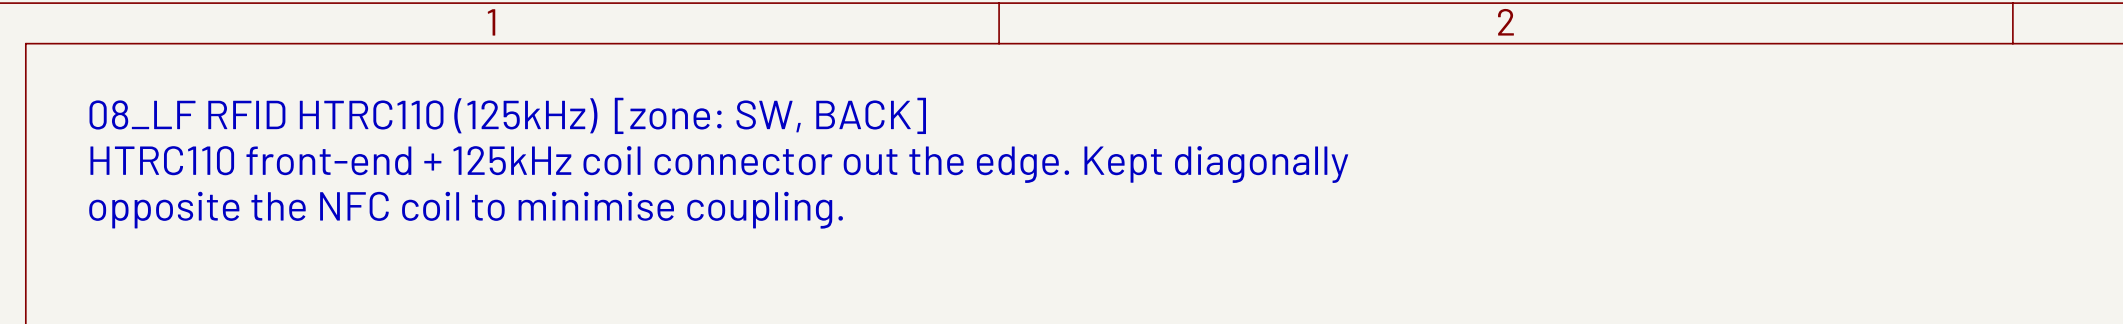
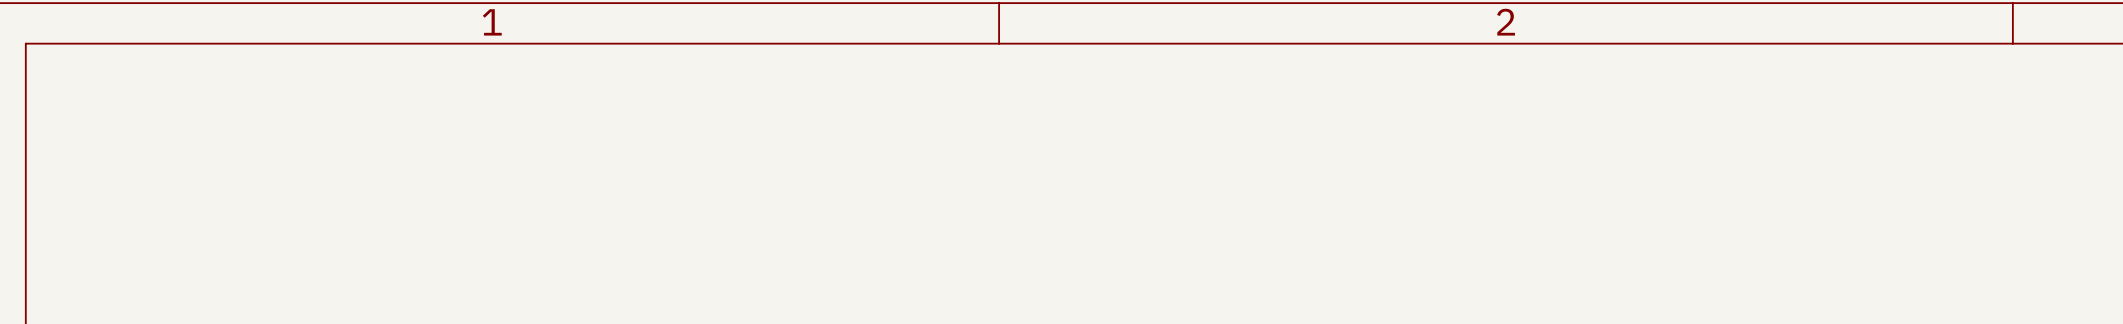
text: 08_LF RFID HTRC110 (125kHz) [zone: SW, BACK] (507, 115) -> none
text: HTRC110 front-end + 125kHz coil connector out the edge. Kept diagonally (719, 164) -> none
text: opposite the NFC coil to minimise coupling. (466, 210) -> none

